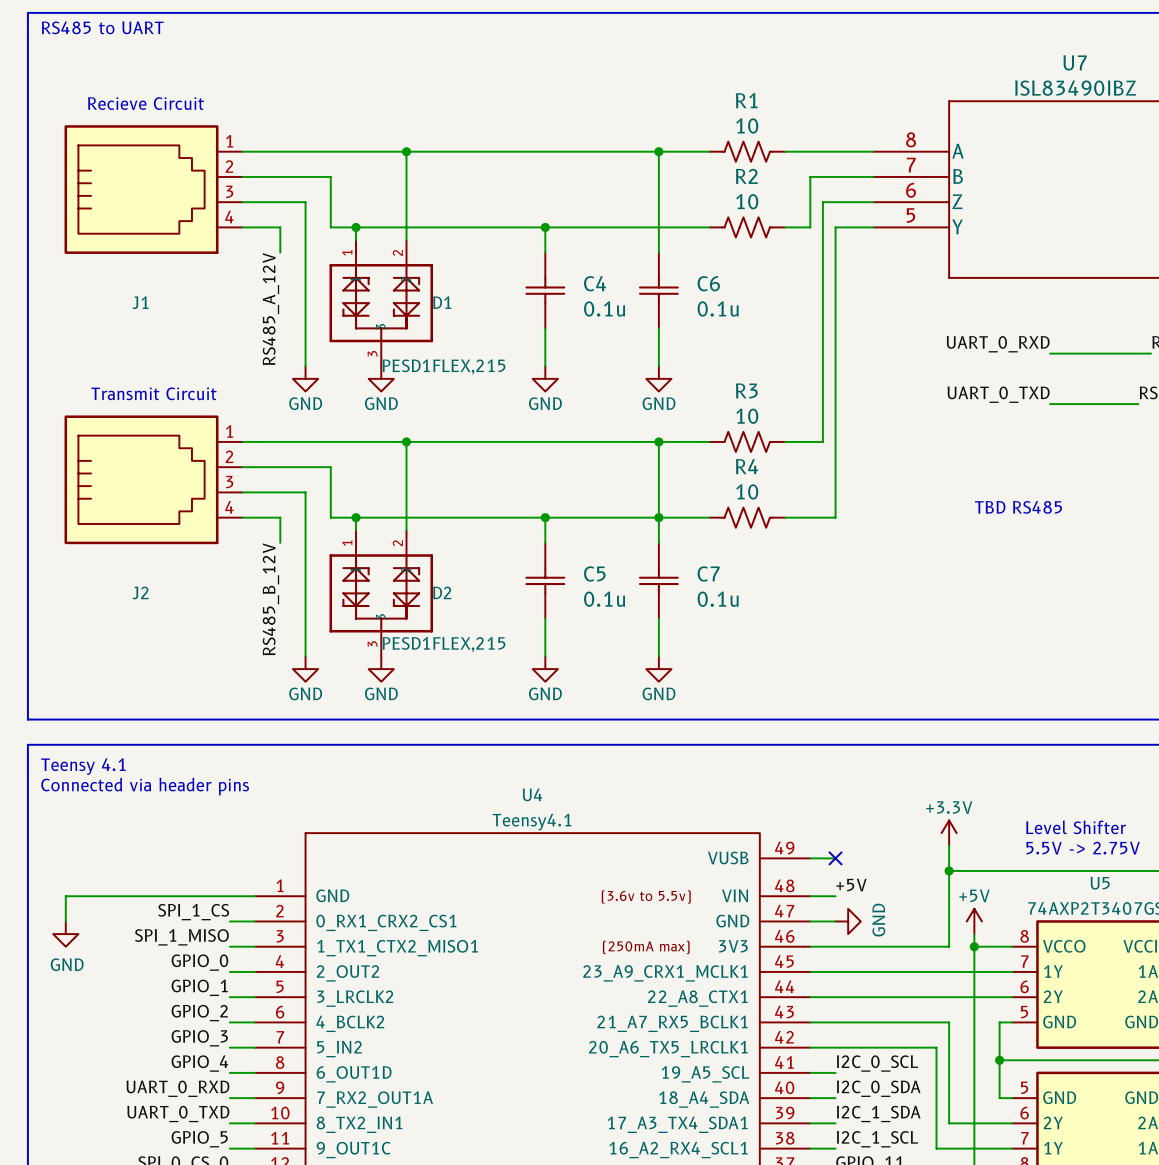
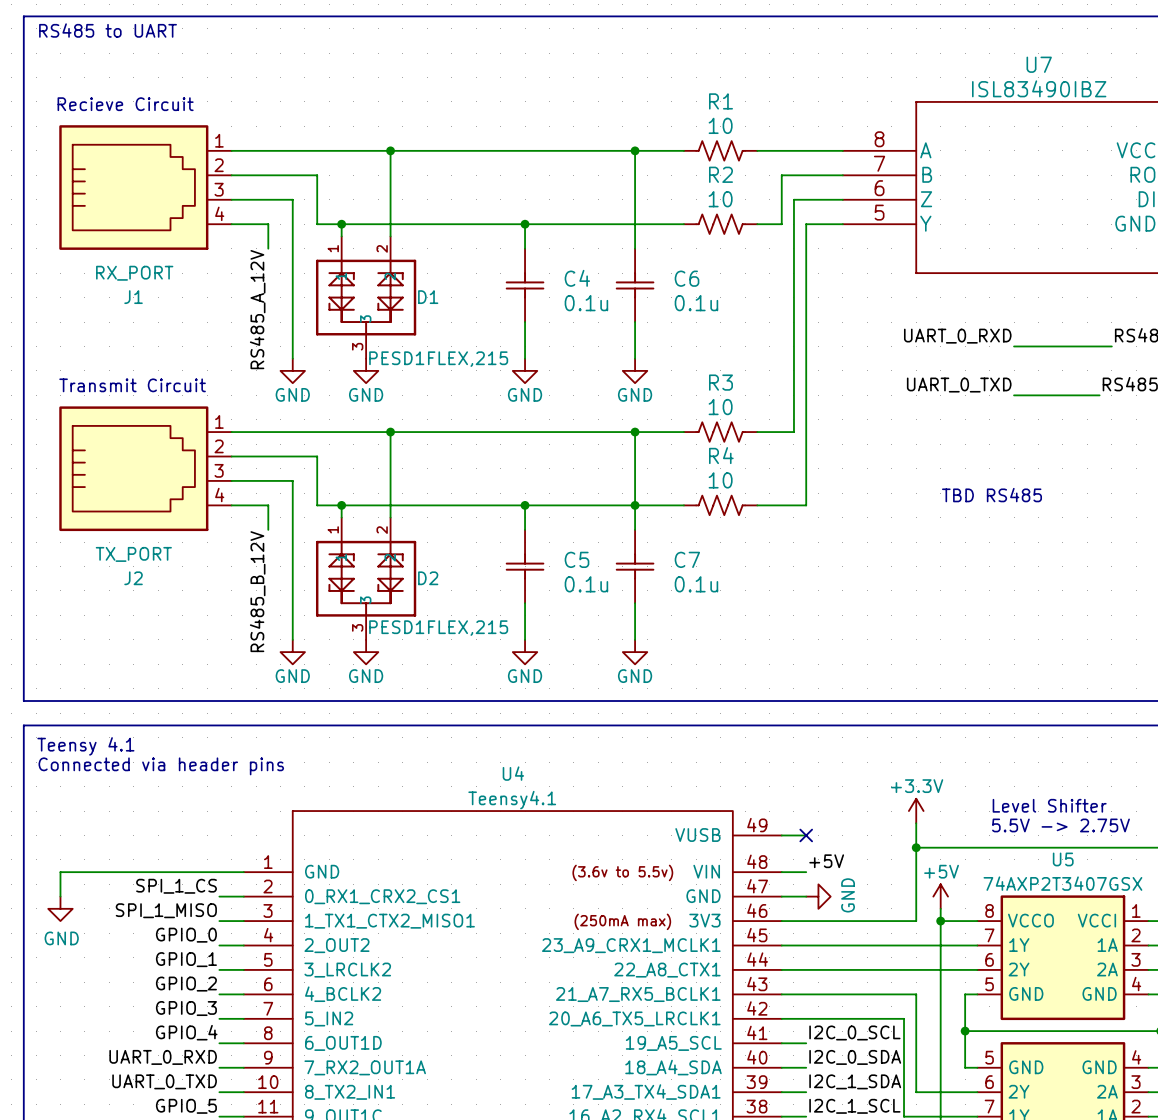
J1 value: none -> RX_PORT (134, 273)
J2 value: none -> TX_PORT (133, 554)

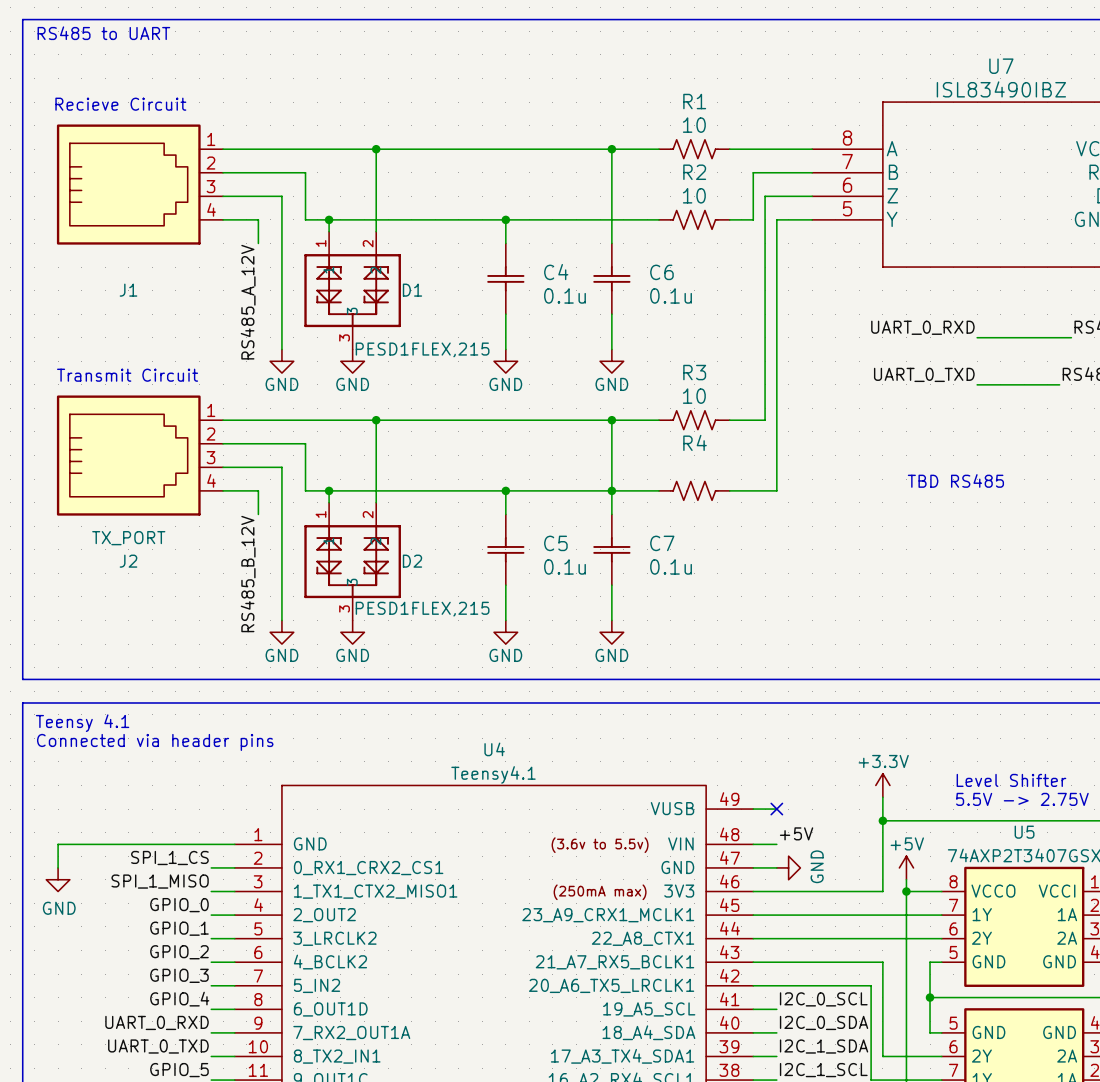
J1 value: RX_PORT (134, 273) -> none
R4 value: 10 (720, 480) -> none

